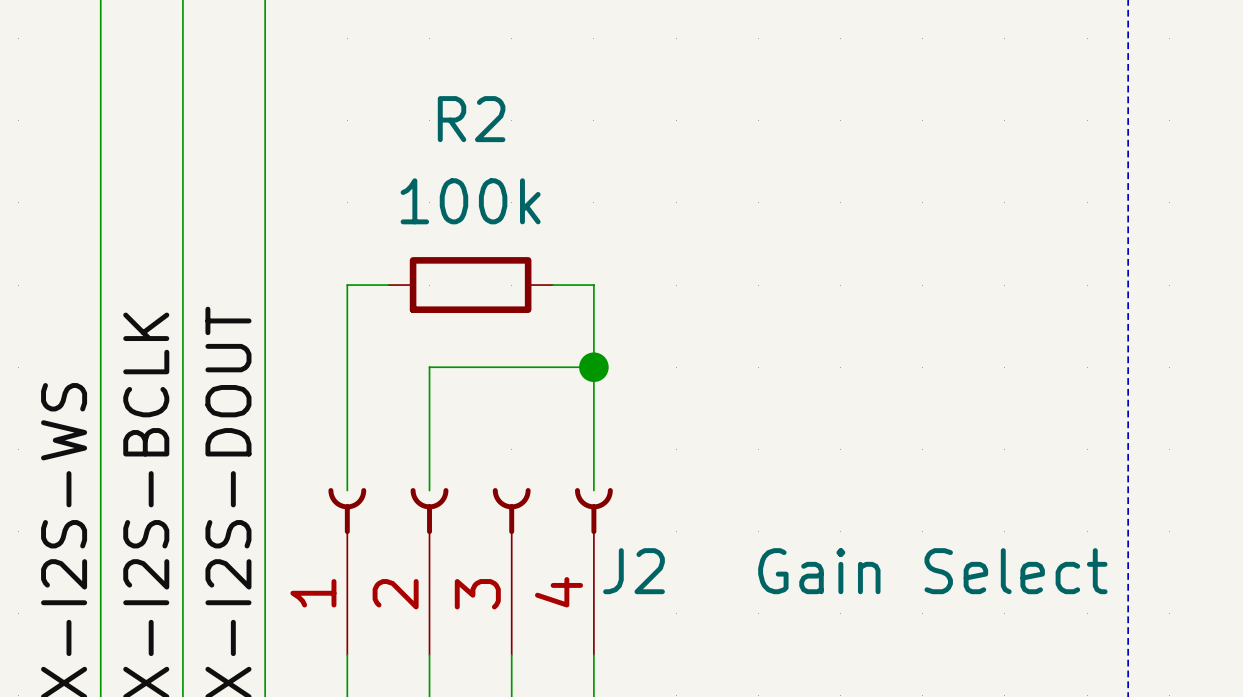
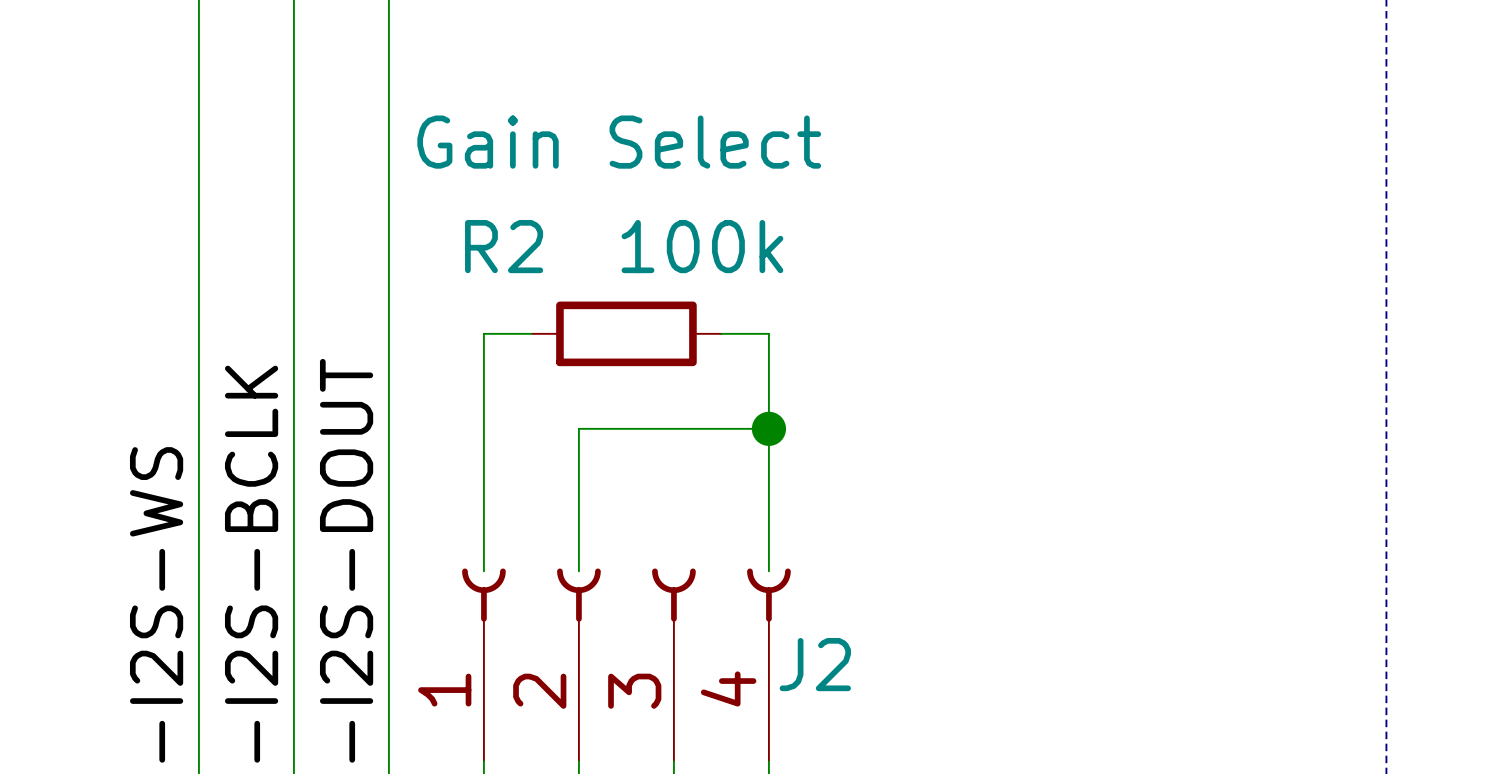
R2 name position: R2 (471, 119) -> R2 (504, 246)
R2 value position: 100k (470, 201) -> 100k (702, 246)
J2 value position: Gain Select (932, 571) -> Gain Select (619, 142)

